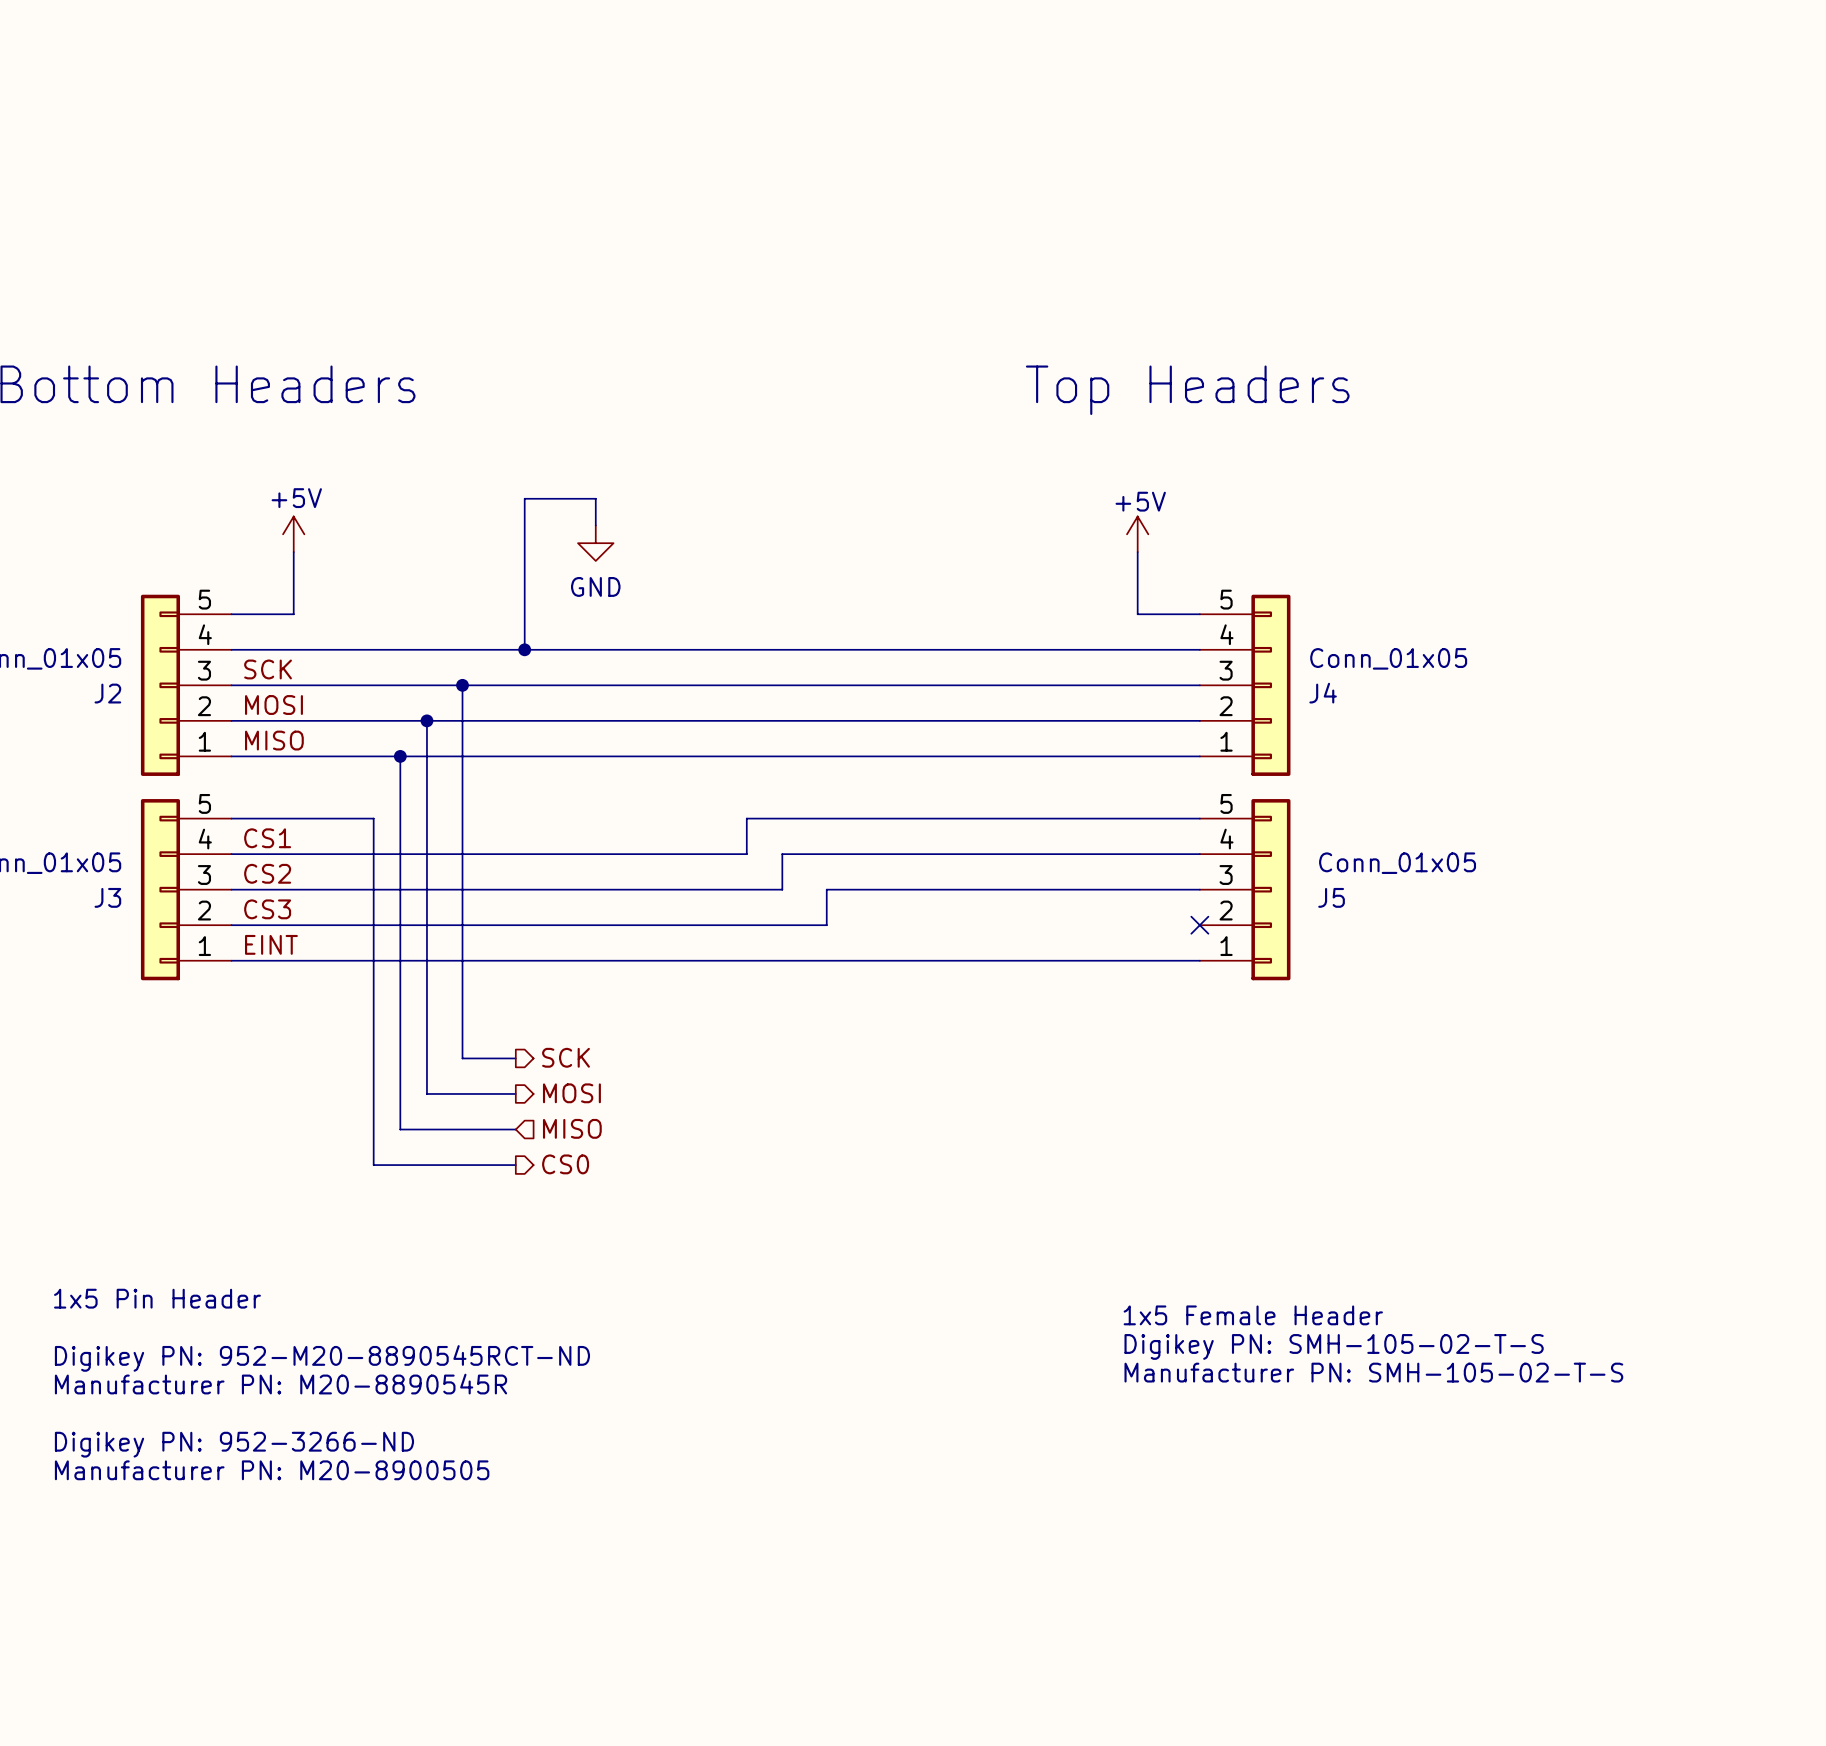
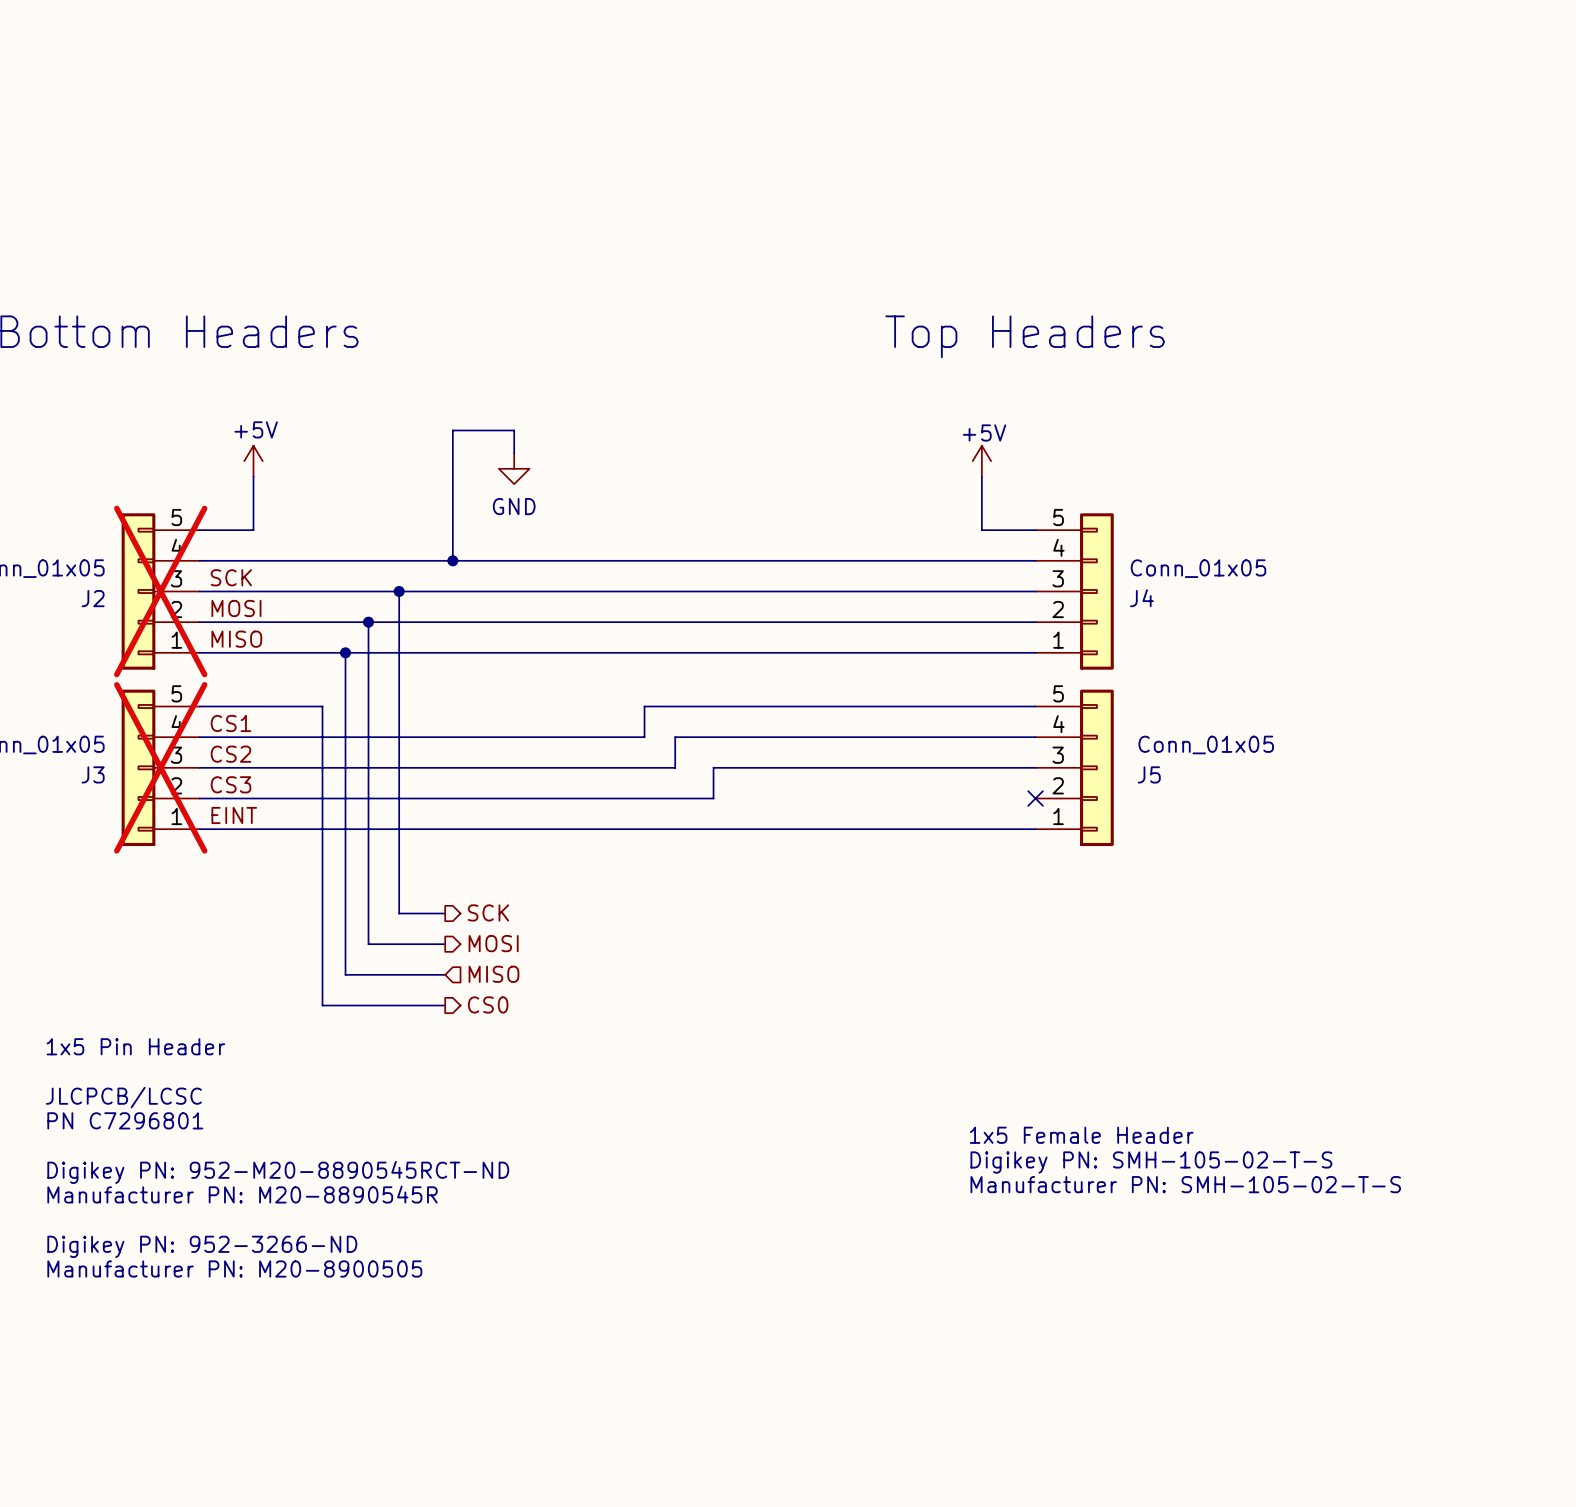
J2 do-not-place cross: none -> (160, 591)
J3 do-not-place cross: none -> (160, 767)
text: none -> 1x5 Pin Header (135, 1046)
text: none -> JLCPCB/LCSC (123, 1097)
text: 1x5 Pin Header (157, 1298) -> PN C7296801 (125, 1120)

